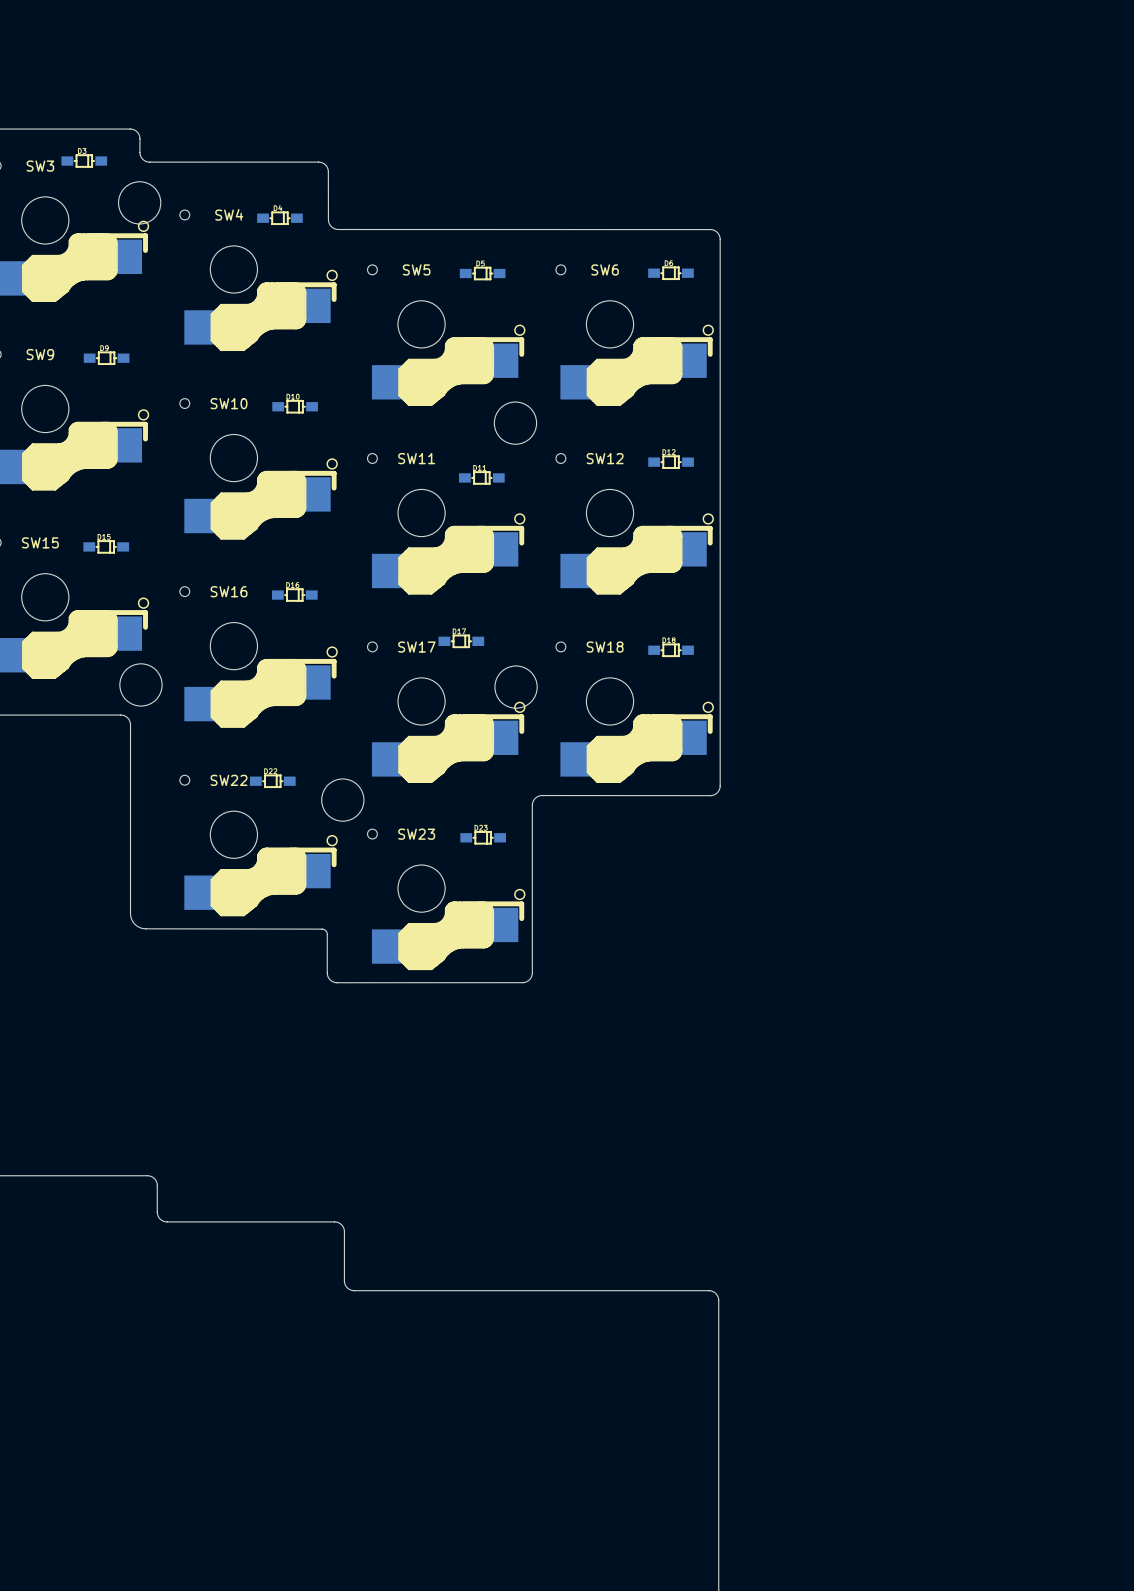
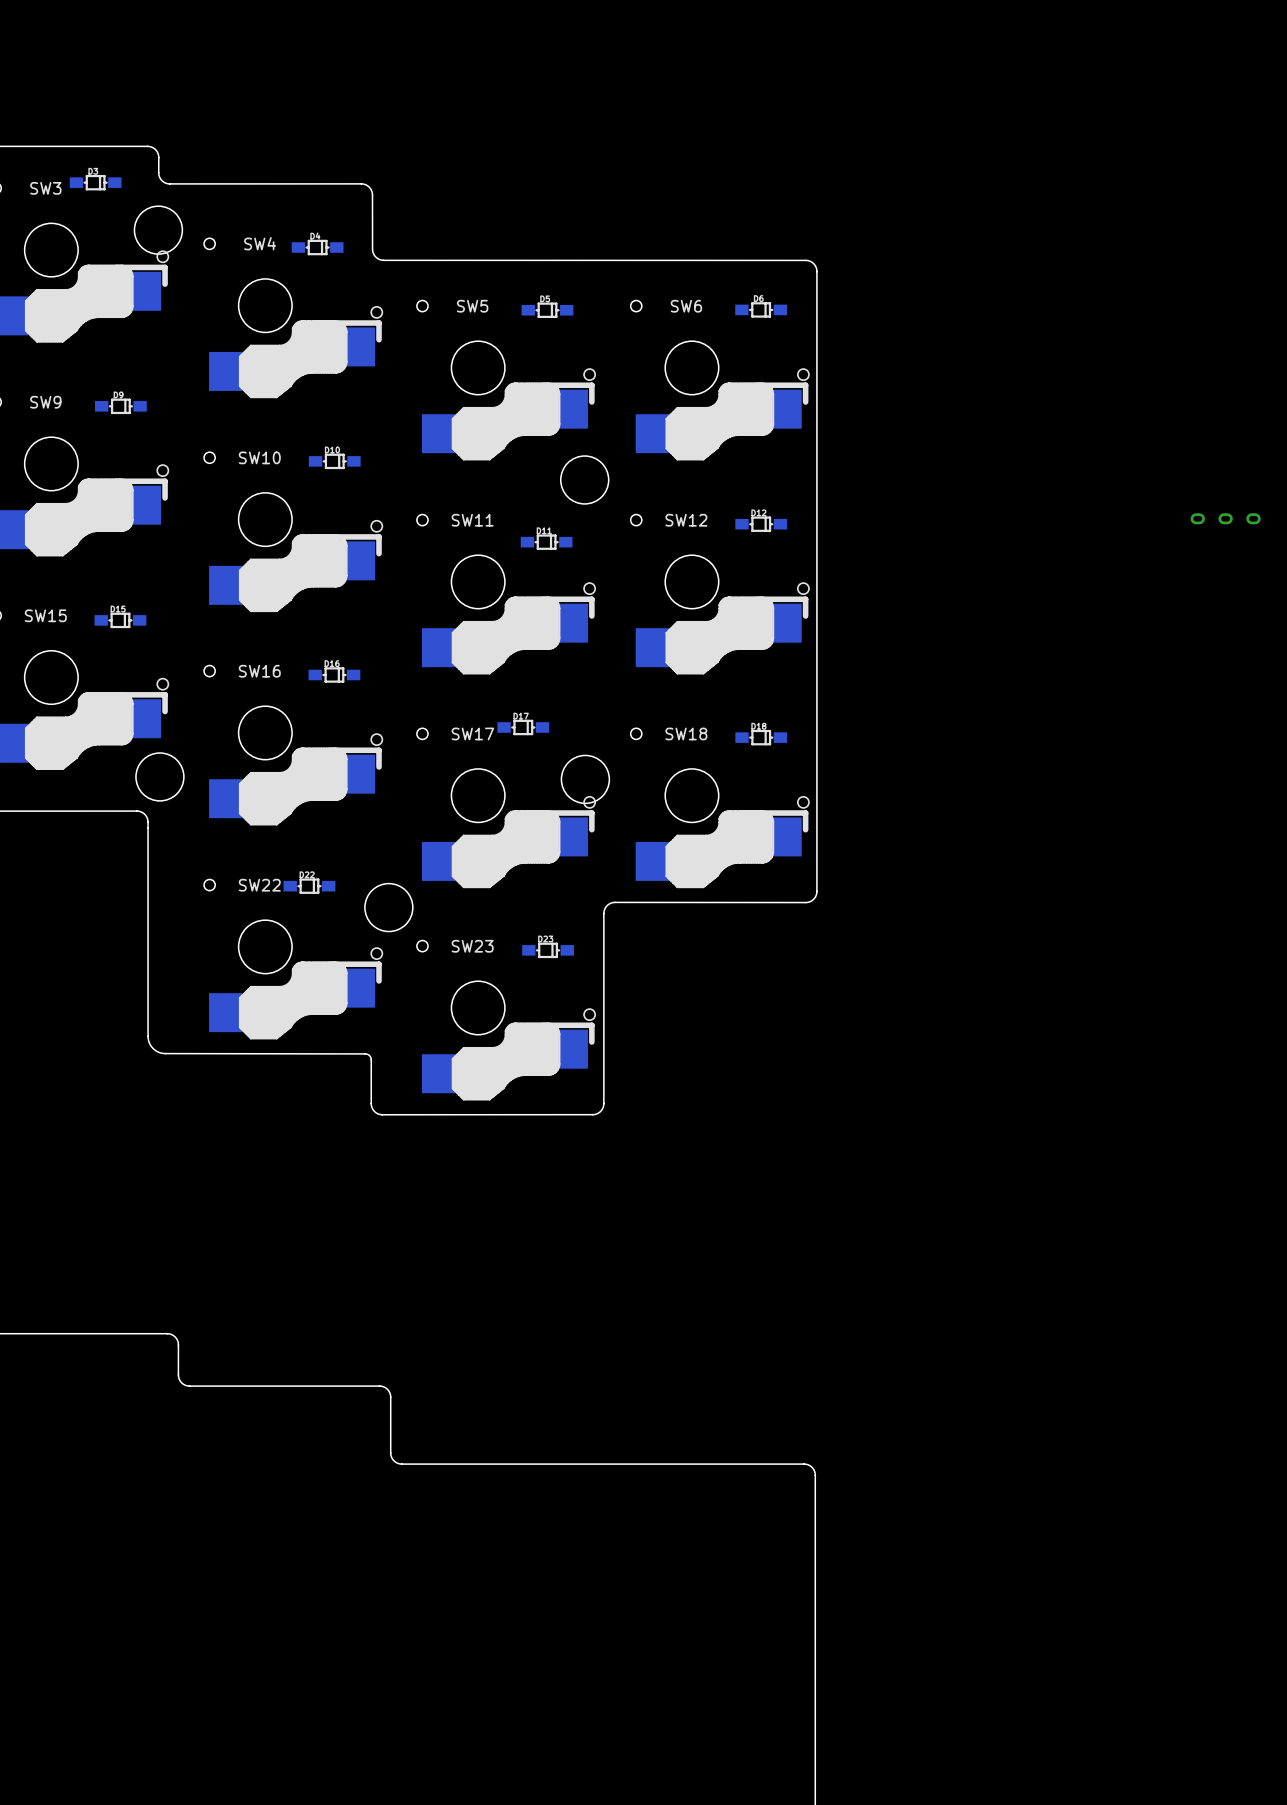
part: none -> (1225, 518)

